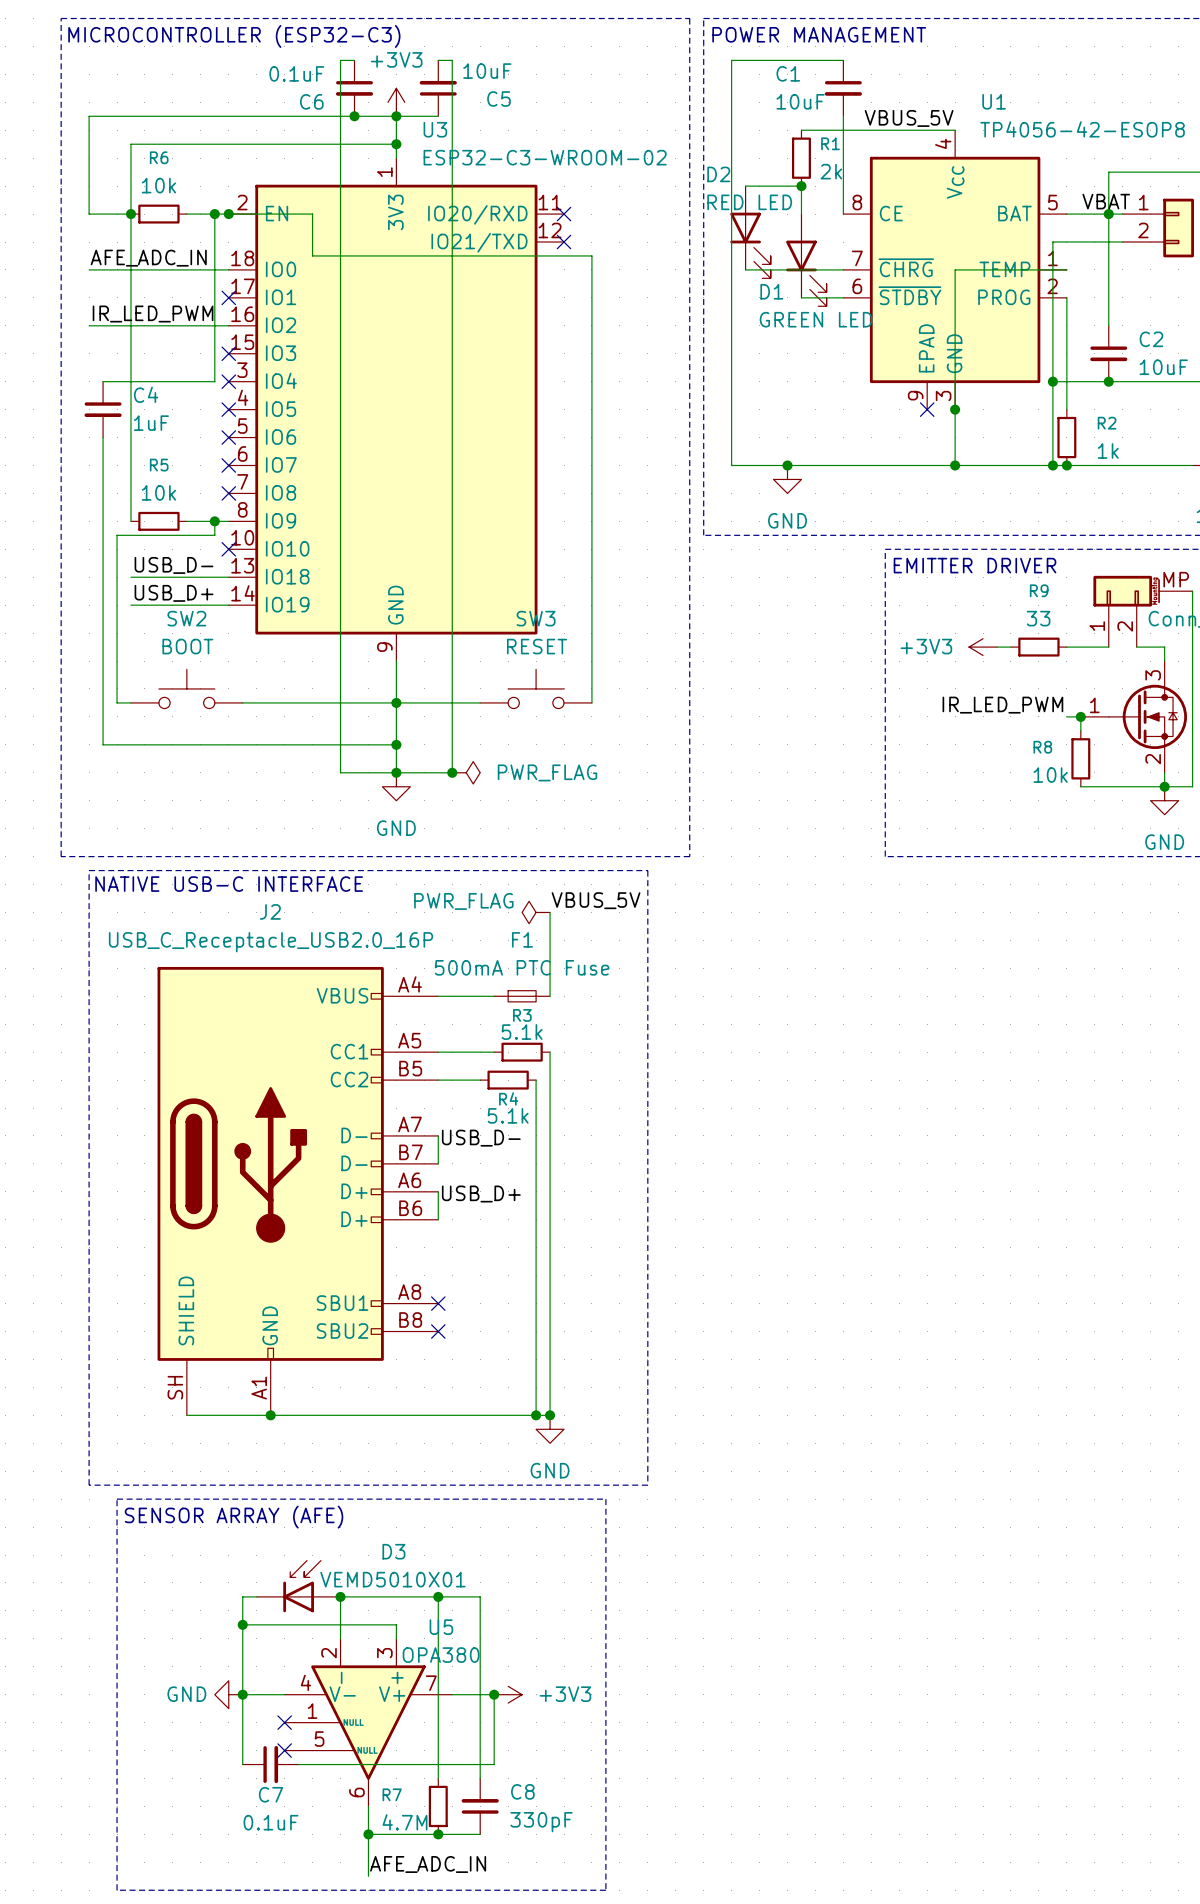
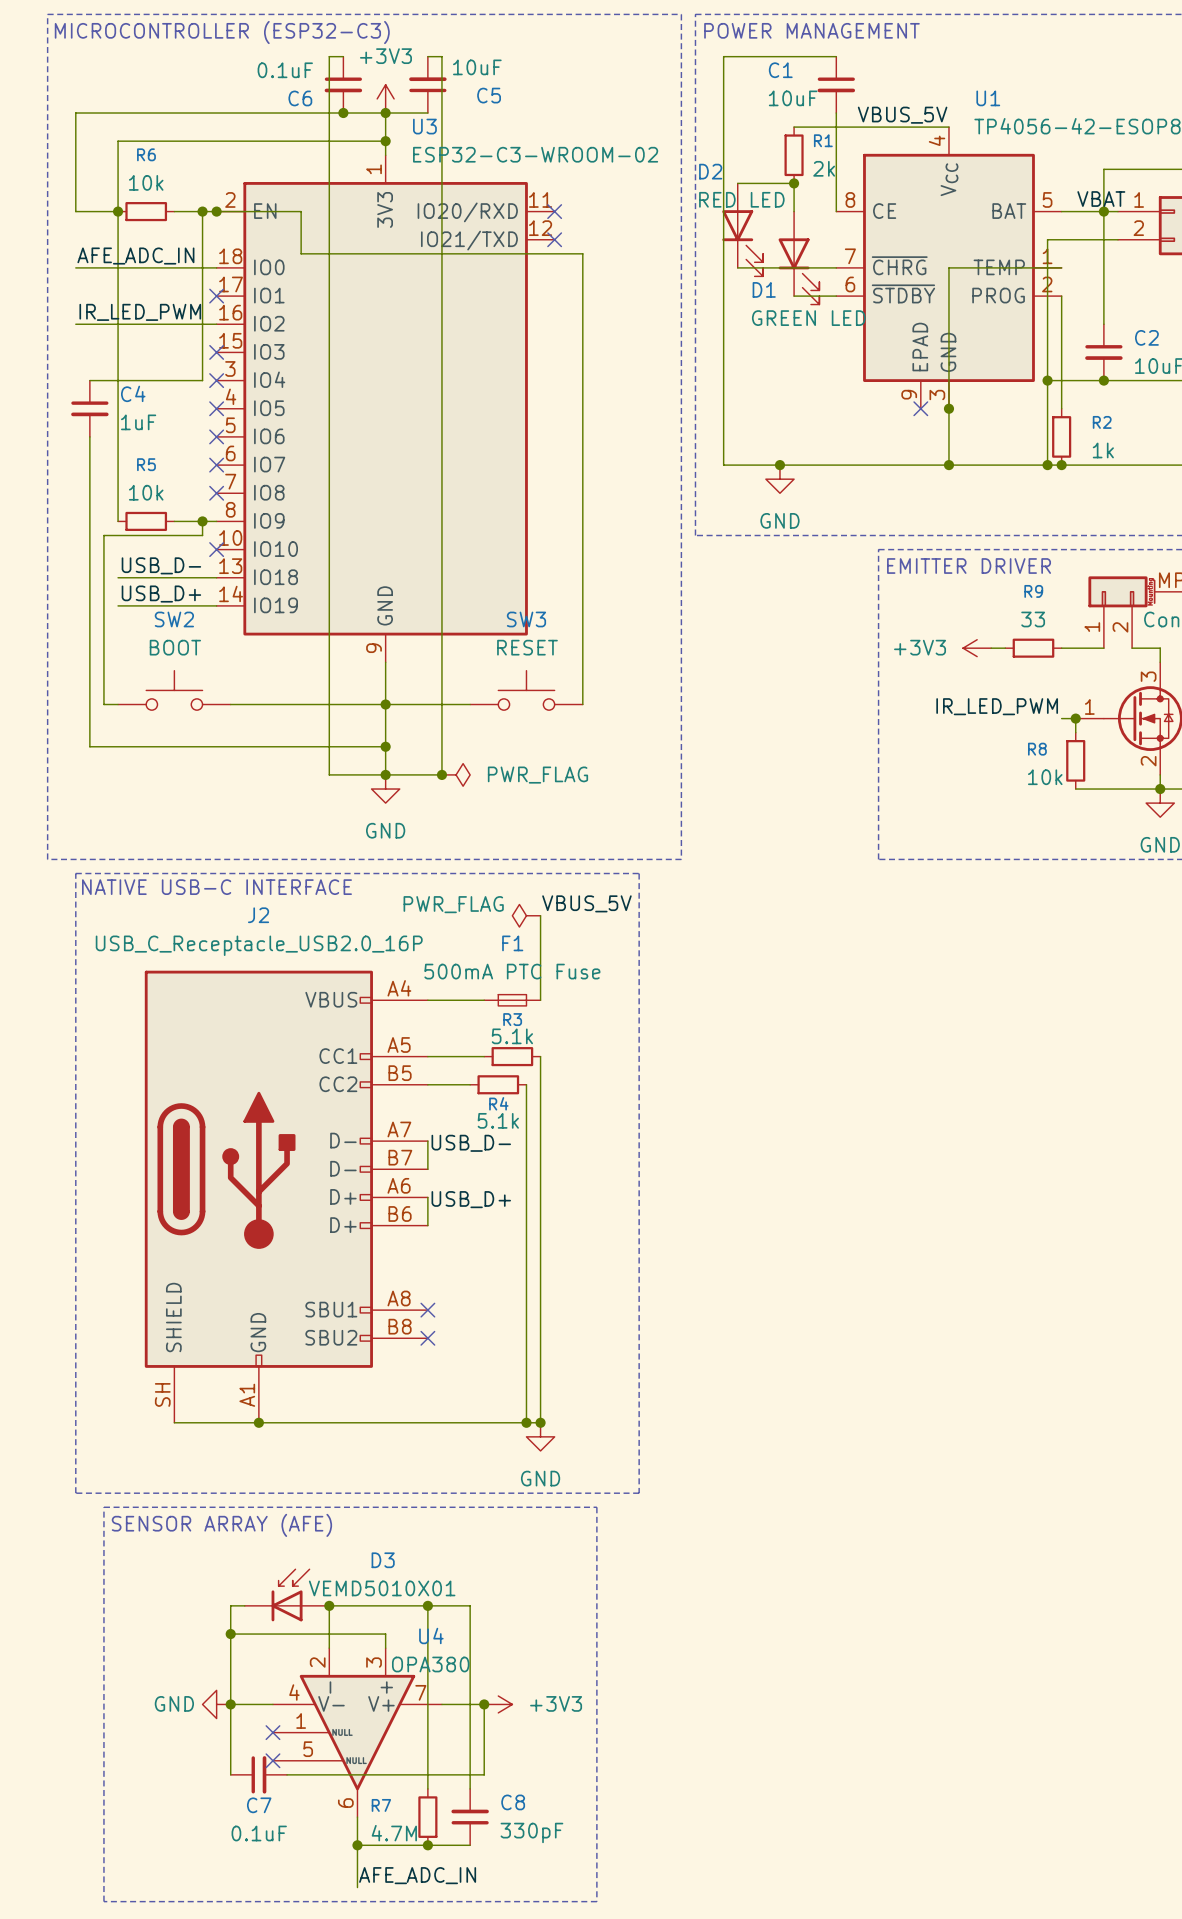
U5 name: U5 (441, 1627) -> U4 (431, 1635)

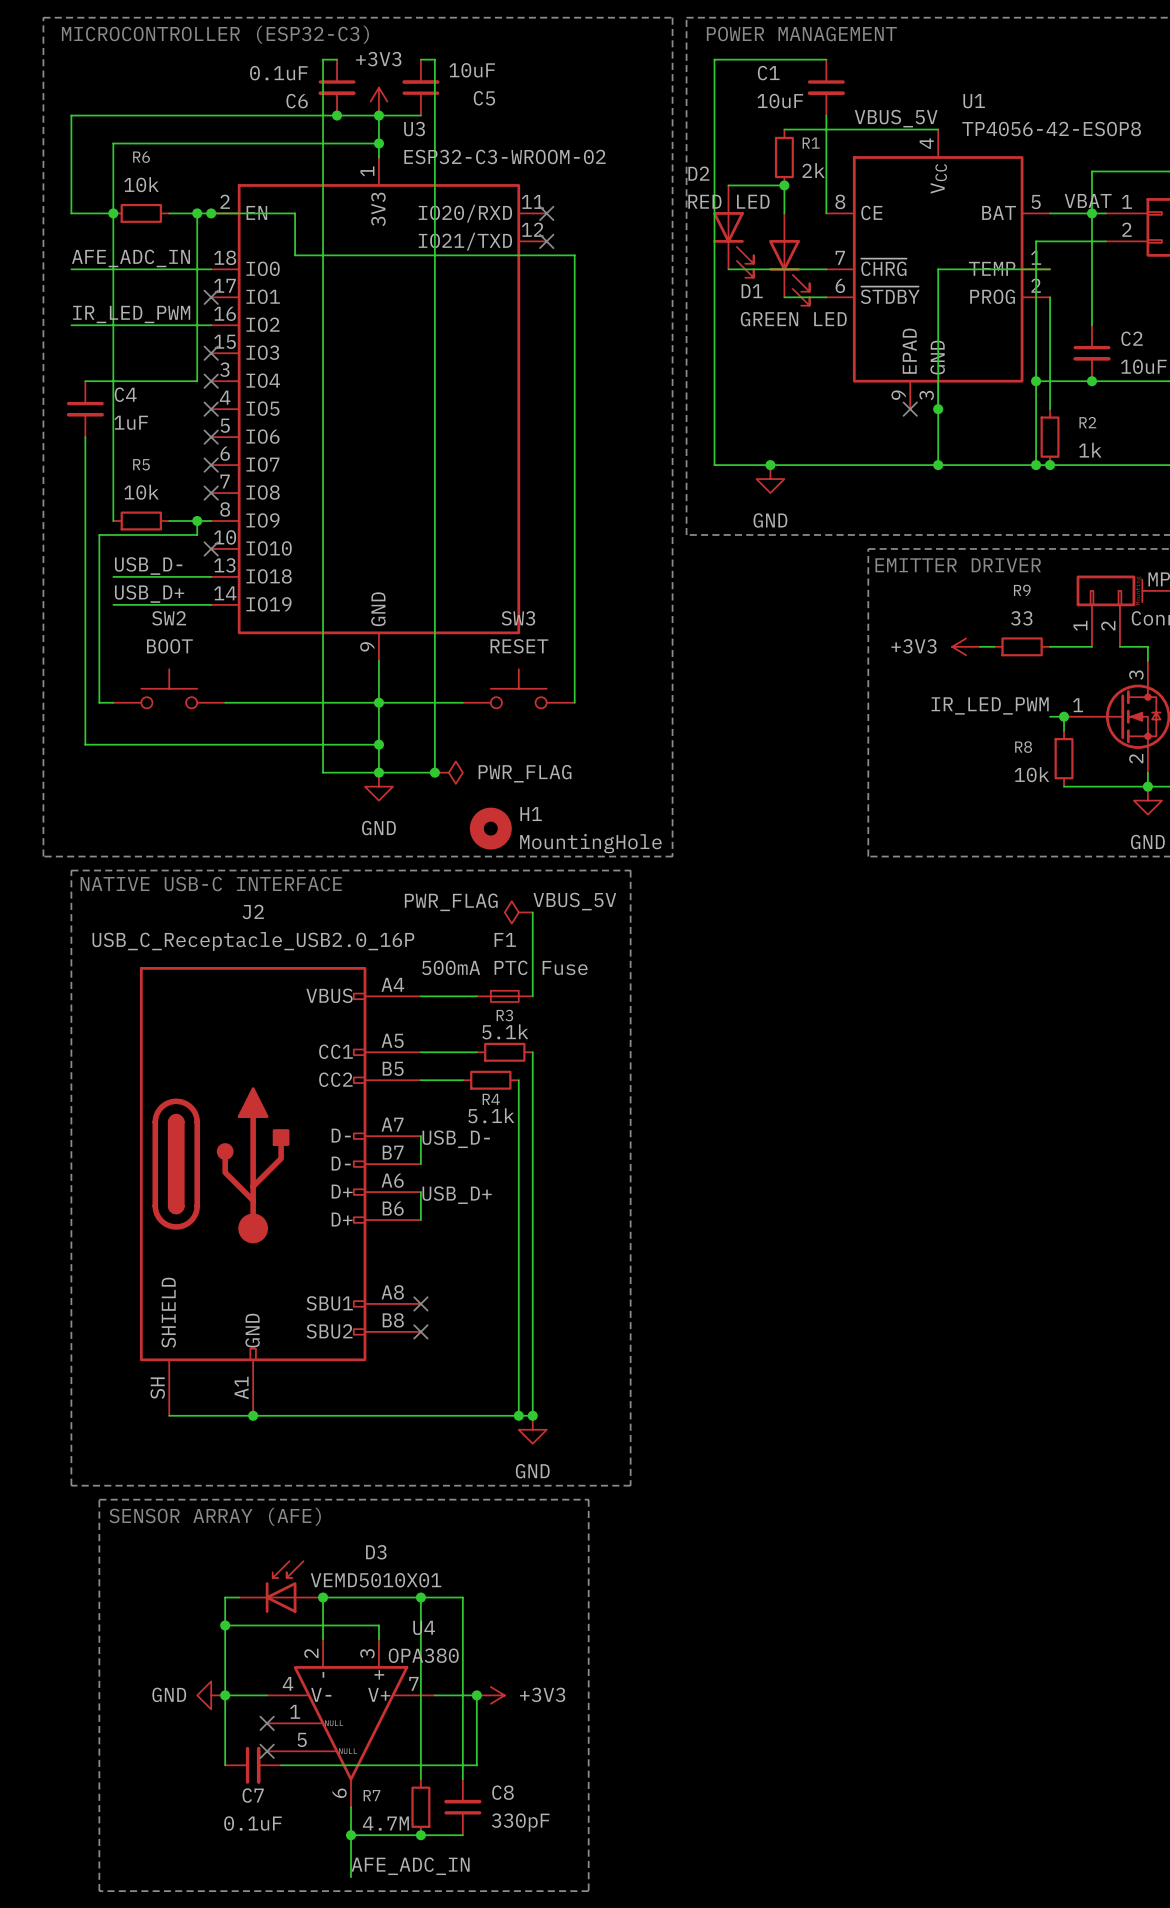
H1: none -> MountingHole (490, 828)

